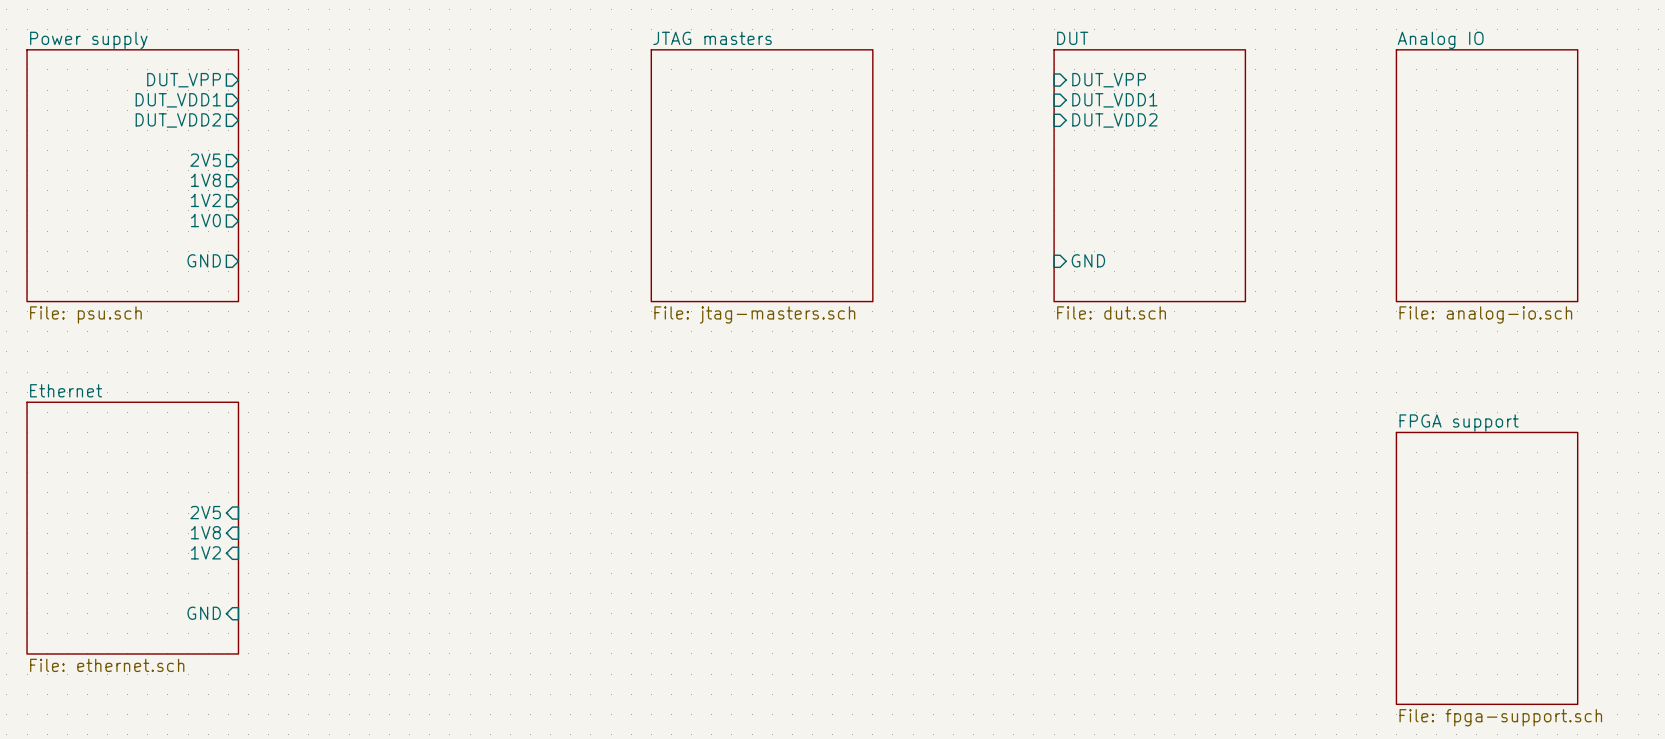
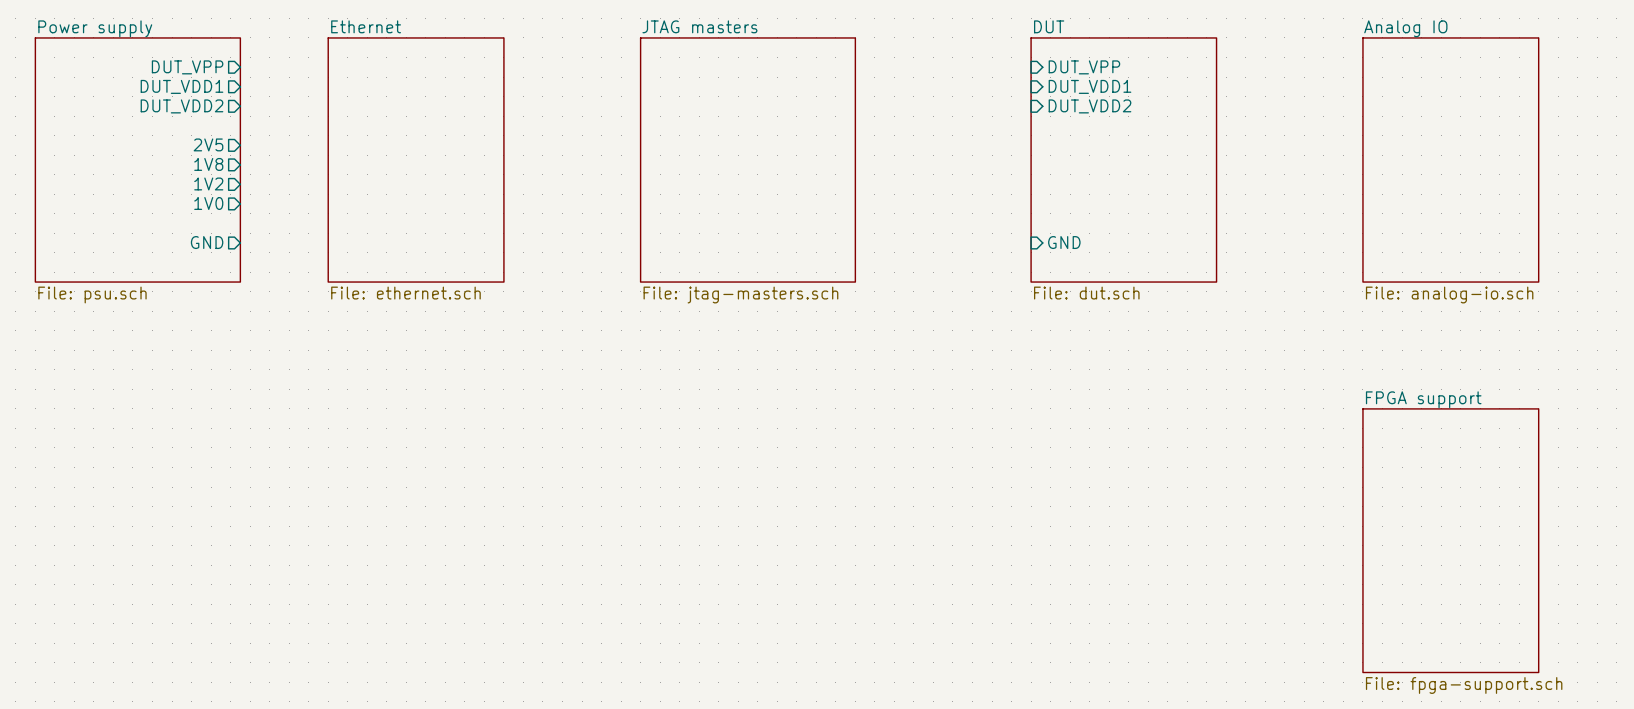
sheet Ethernet: none -> File: ethernet.sch (416, 160)
sheet pin: 2V5 (205, 512) -> none
sheet Ethernet: File: ethernet.sch (132, 528) -> none
sheet pin: 1V8 (205, 532) -> none
sheet pin: 1V2 (205, 552) -> none
sheet pin: GND (204, 613) -> none

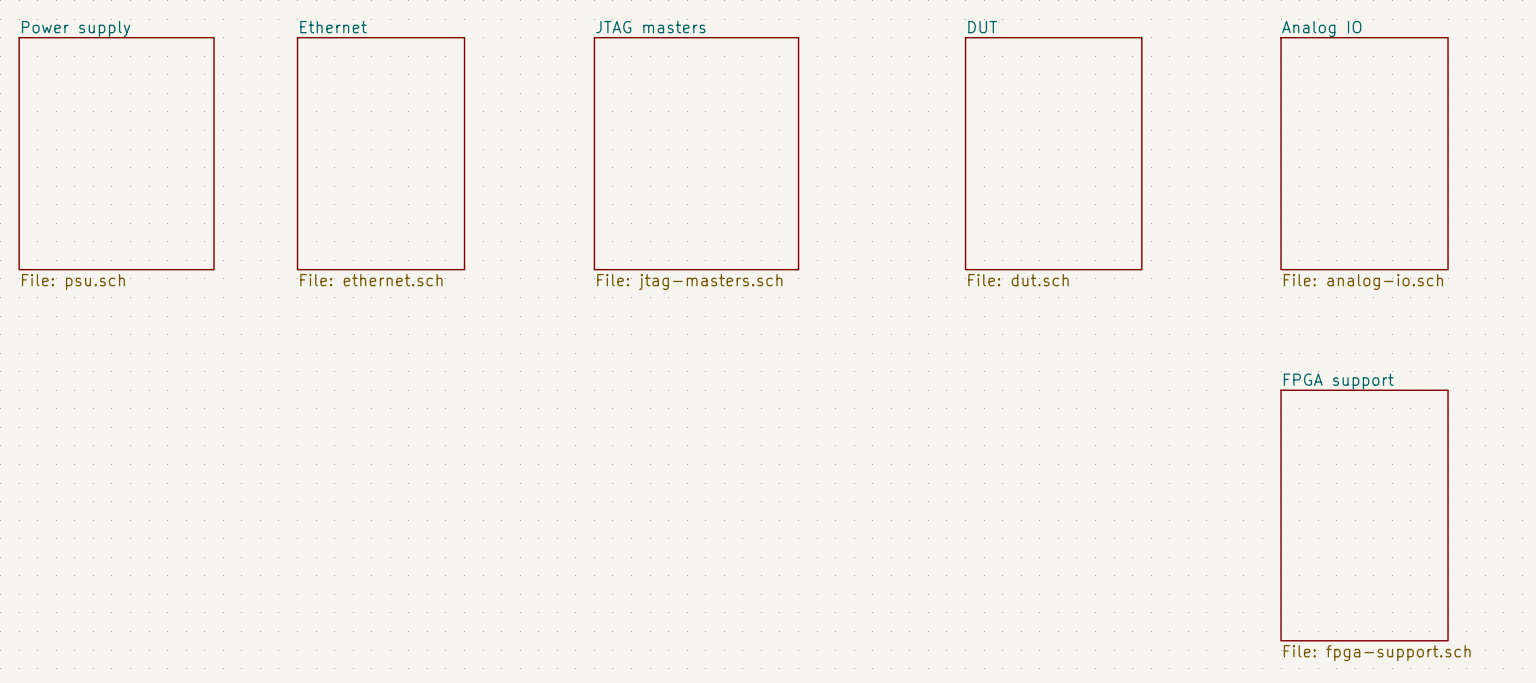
sheet pin: DUT_VPP (187, 67) -> none
sheet pin: DUT_VPP (1084, 67) -> none
sheet pin: DUT_VDD1 (182, 86) -> none
sheet pin: DUT_VDD1 (1089, 86) -> none
sheet pin: DUT_VDD2 (182, 106) -> none
sheet pin: DUT_VDD2 (1089, 106) -> none
sheet pin: 2V5 (208, 144) -> none
sheet pin: 1V8 (208, 164) -> none
sheet pin: 1V2 (208, 183) -> none
sheet pin: 1V0 (208, 203) -> none
sheet pin: GND (207, 242) -> none
sheet pin: GND (1064, 242) -> none

